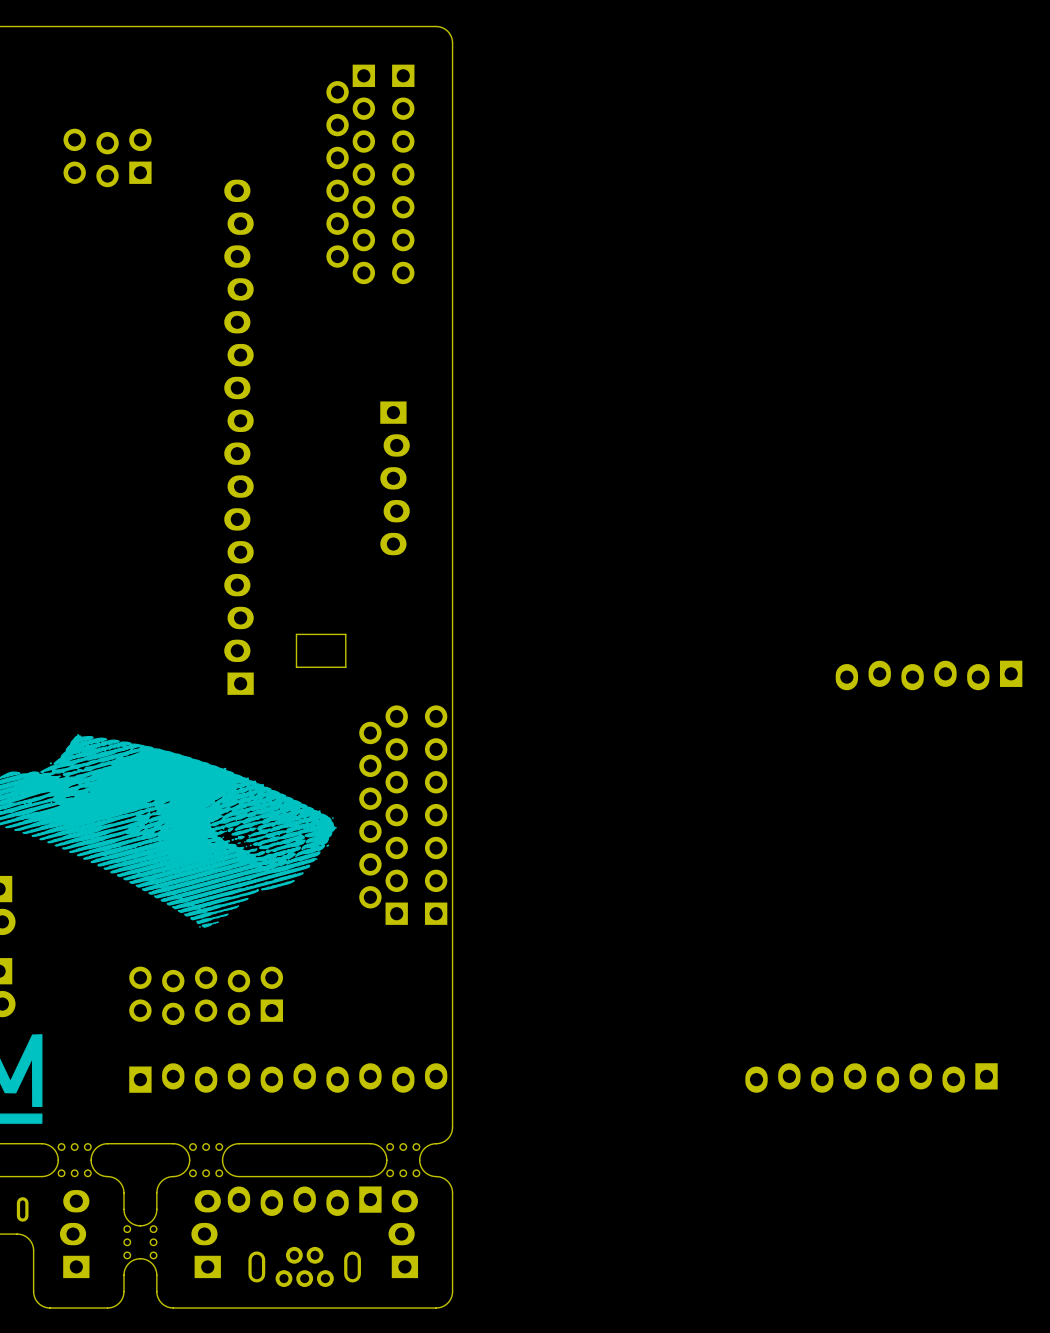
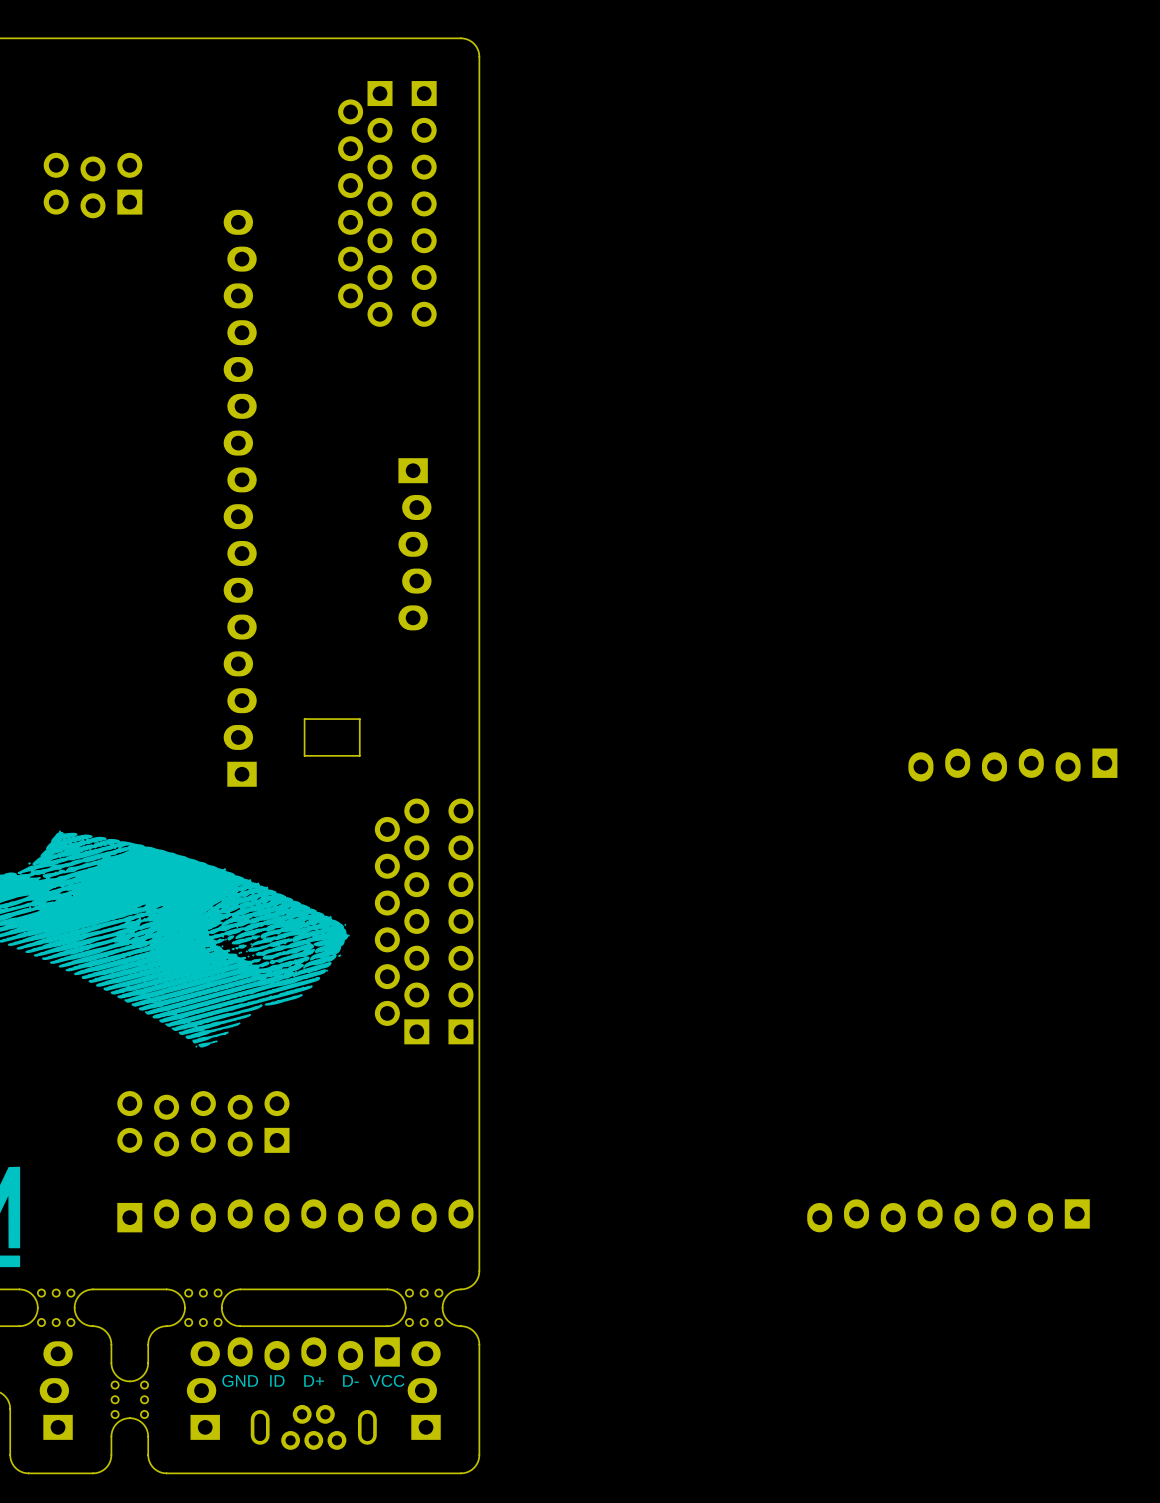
text: none -> GND (240, 1380)
text: none -> ID (277, 1380)
text: none -> D+ (314, 1380)
text: none -> D- (350, 1380)
text: none -> VCC (387, 1380)

